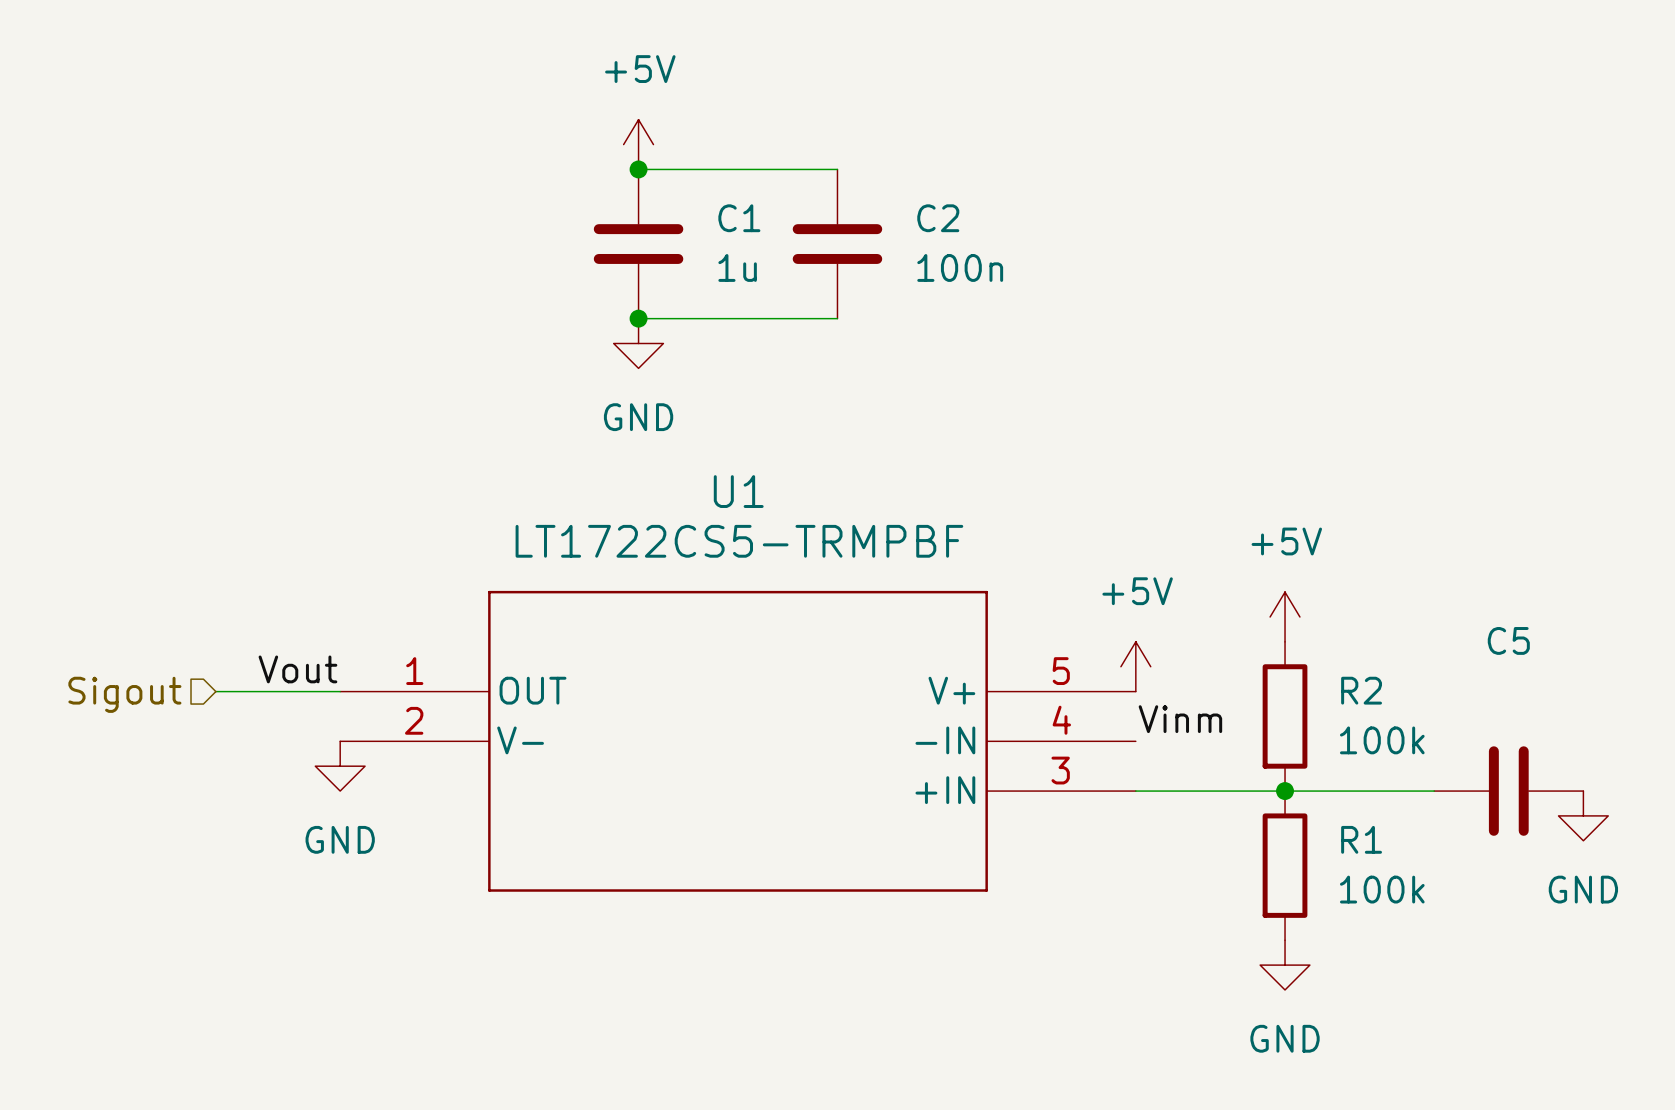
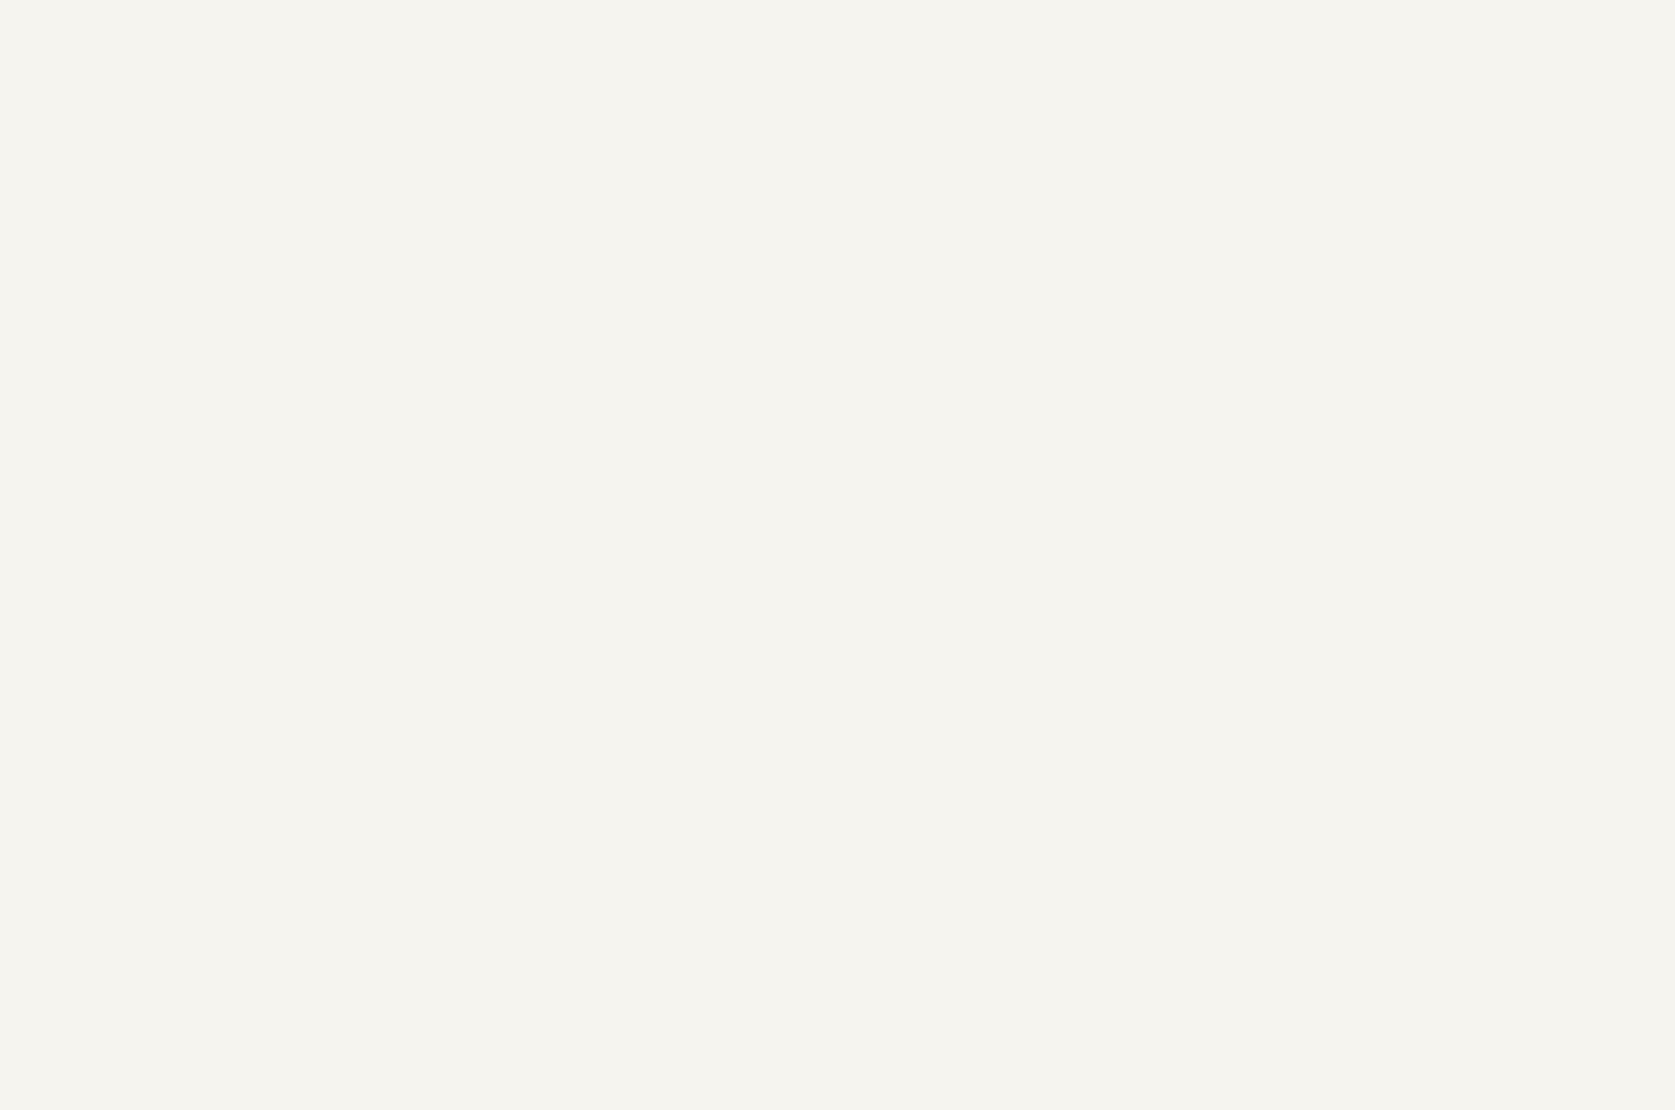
power symbol: +5V (638, 144) -> none
wire: (638, 169) (837, 169) -> none
junction: (638, 169) -> none
C1: 1u (638, 244) -> none
C2: 100n (837, 244) -> none
wire: (638, 318) (837, 318) -> none
junction: (638, 318) -> none
power symbol: GND (638, 343) -> none
power symbol: +5V (1285, 617) -> none
power symbol: +5V (1135, 666) -> none
label: Vout (297, 669) -> none
wire: (215, 691) (340, 691) -> none
hierarchical label: Sigout (124, 694) -> none
R2: 100k (1285, 716) -> none
label: Vinm (1180, 719) -> none
U1: LT1722CS5-TRMPBF (738, 741) -> none
power symbol: GND (340, 766) -> none
wire: (1135, 791) (1434, 791) -> none
junction: (1285, 791) -> none
C5: (1508, 791) -> none
power symbol: GND (1583, 815) -> none
R1: 100k (1285, 865) -> none
power symbol: GND (1285, 965) -> none

